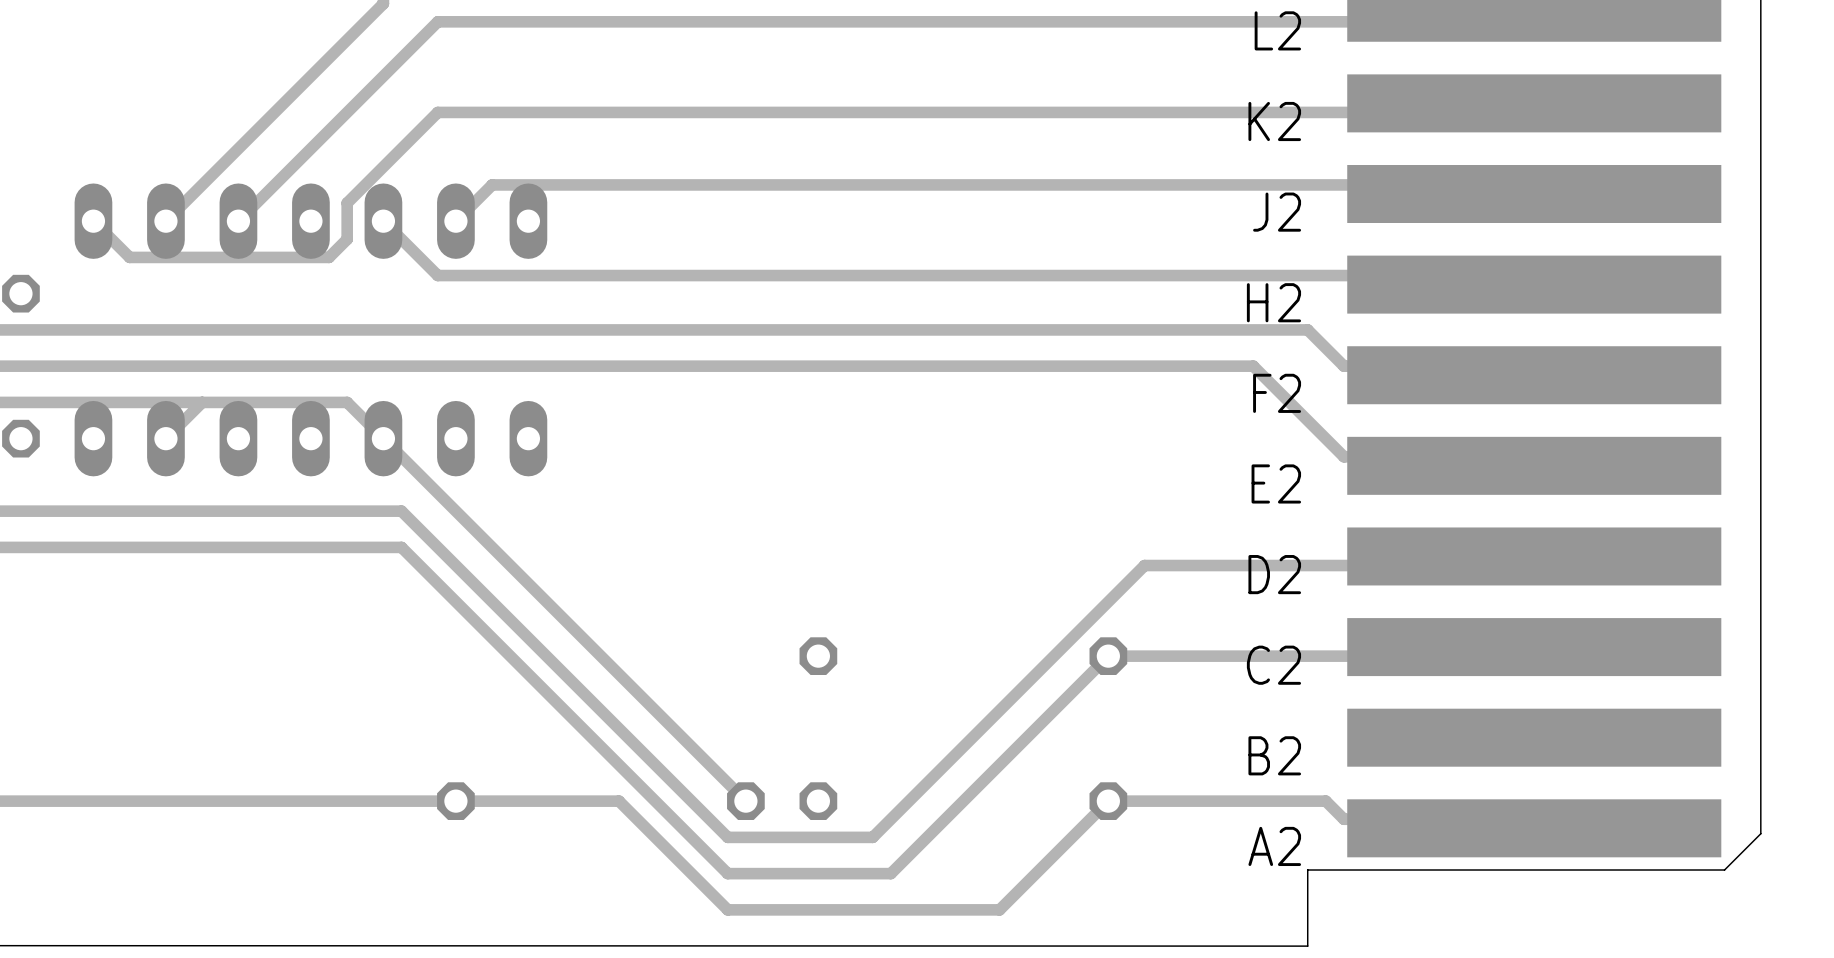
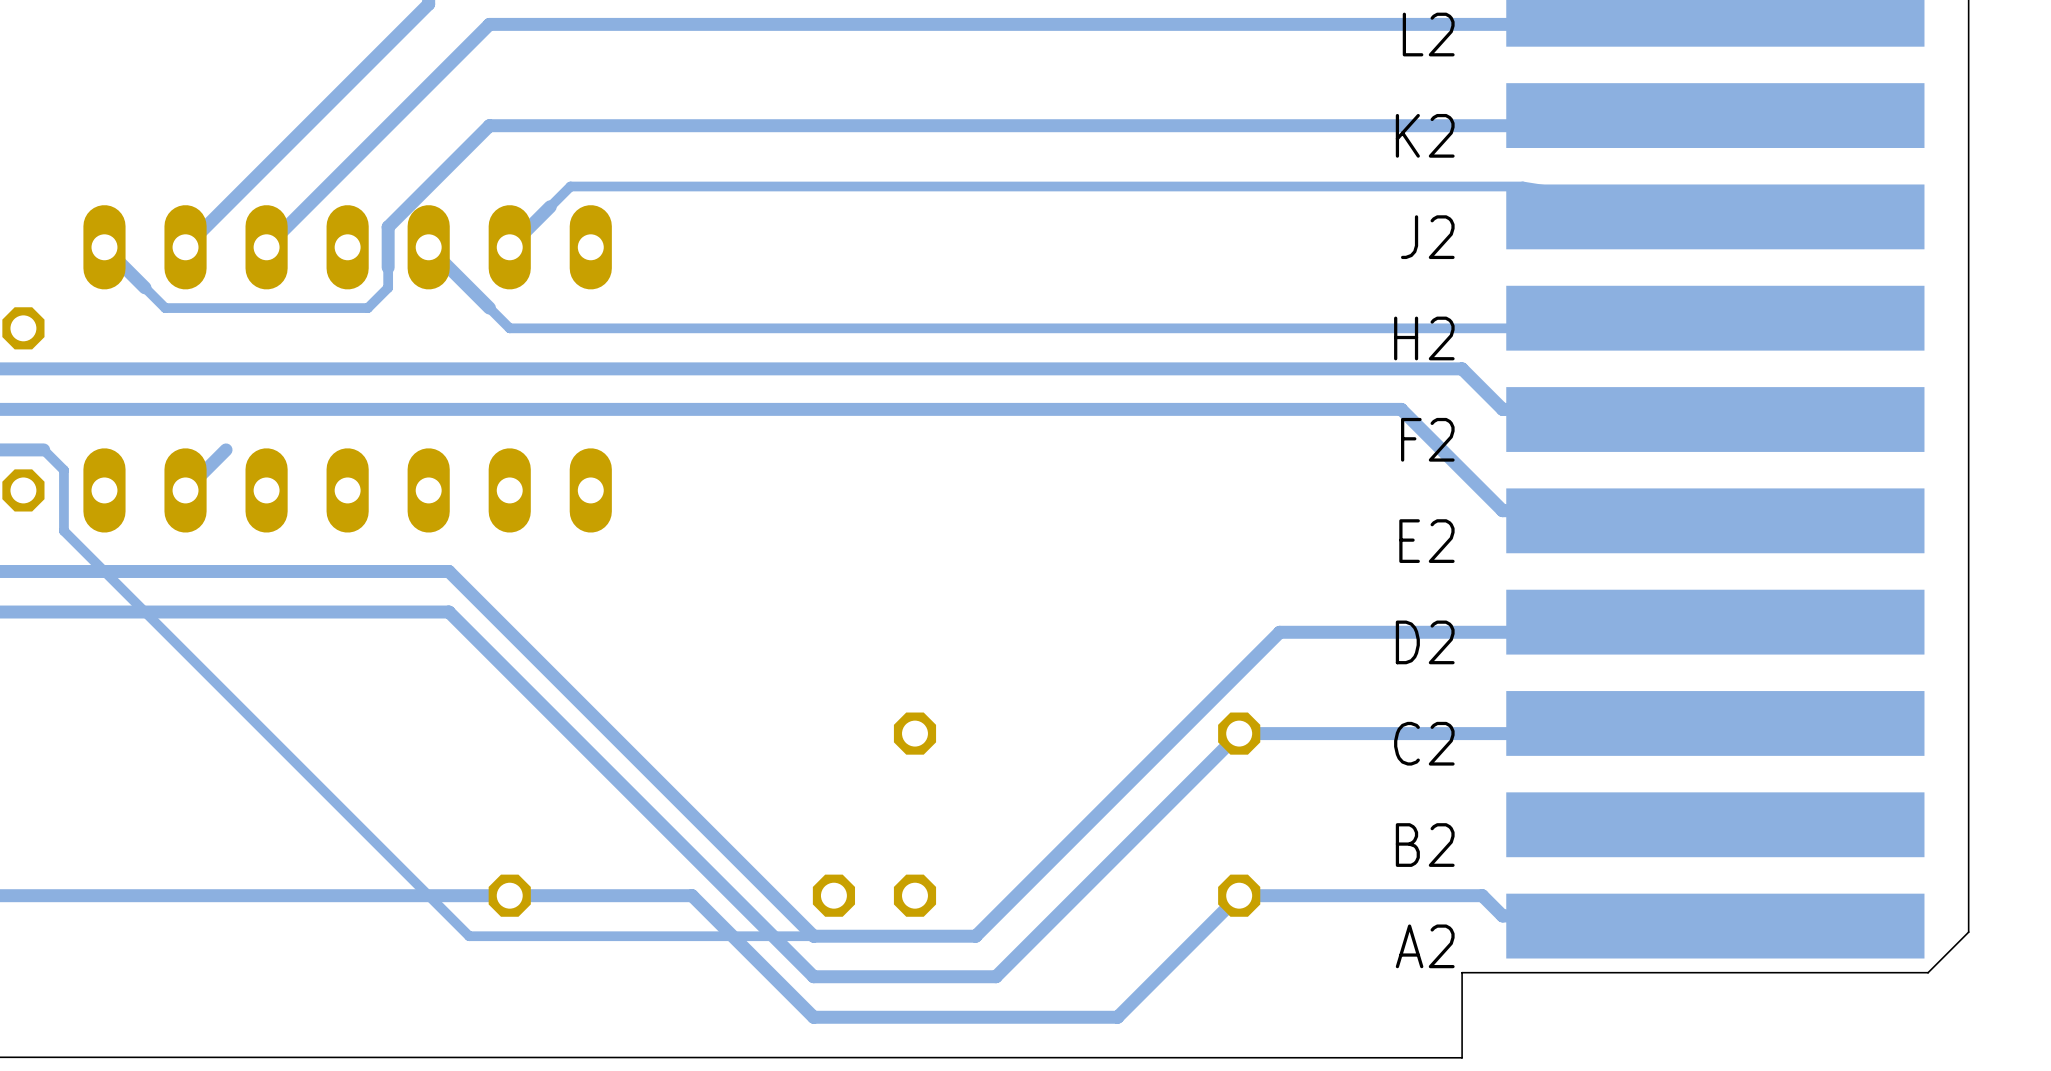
track: (492, 184) (1525, 184) (1534, 193) -> (550, 206) (570, 186) (1522, 186) (1715, 216)
track: (347, 239) (329, 257) (129, 257) -> (388, 267) (388, 287) (367, 308) (165, 308) (145, 287)
track: (437, 275) (1525, 275) (1534, 284) -> (489, 308) (509, 328) (1522, 328) (1715, 318)
track: (39, 402) (347, 402) (745, 801) -> (43, 449) (63, 470) (63, 530) (469, 936) (813, 936)

